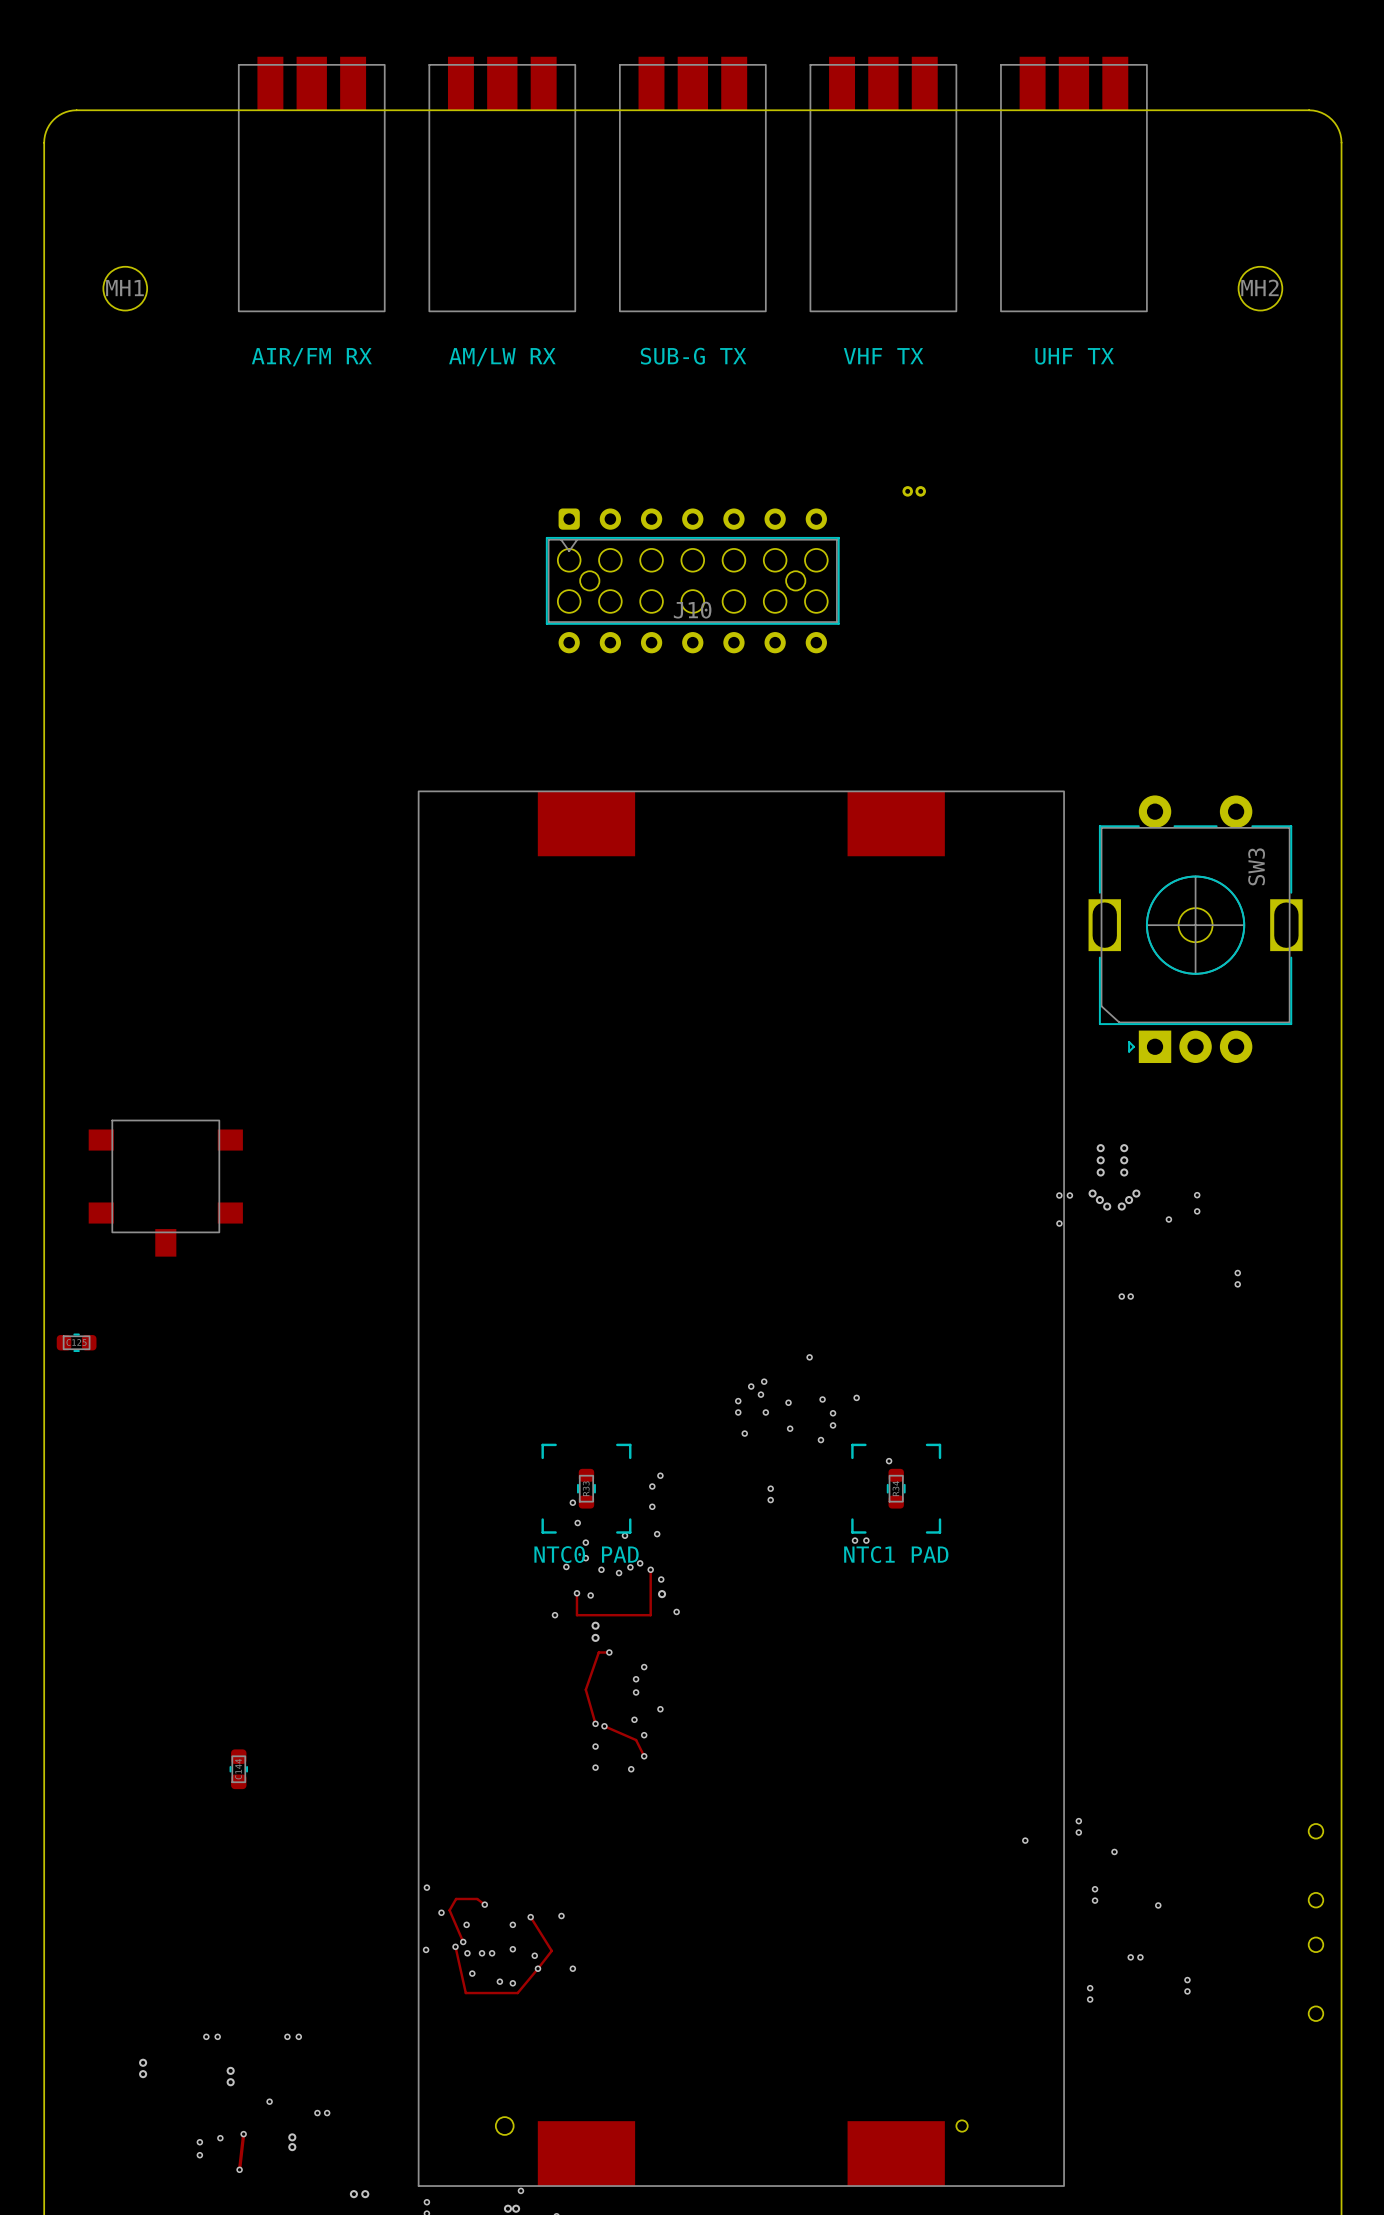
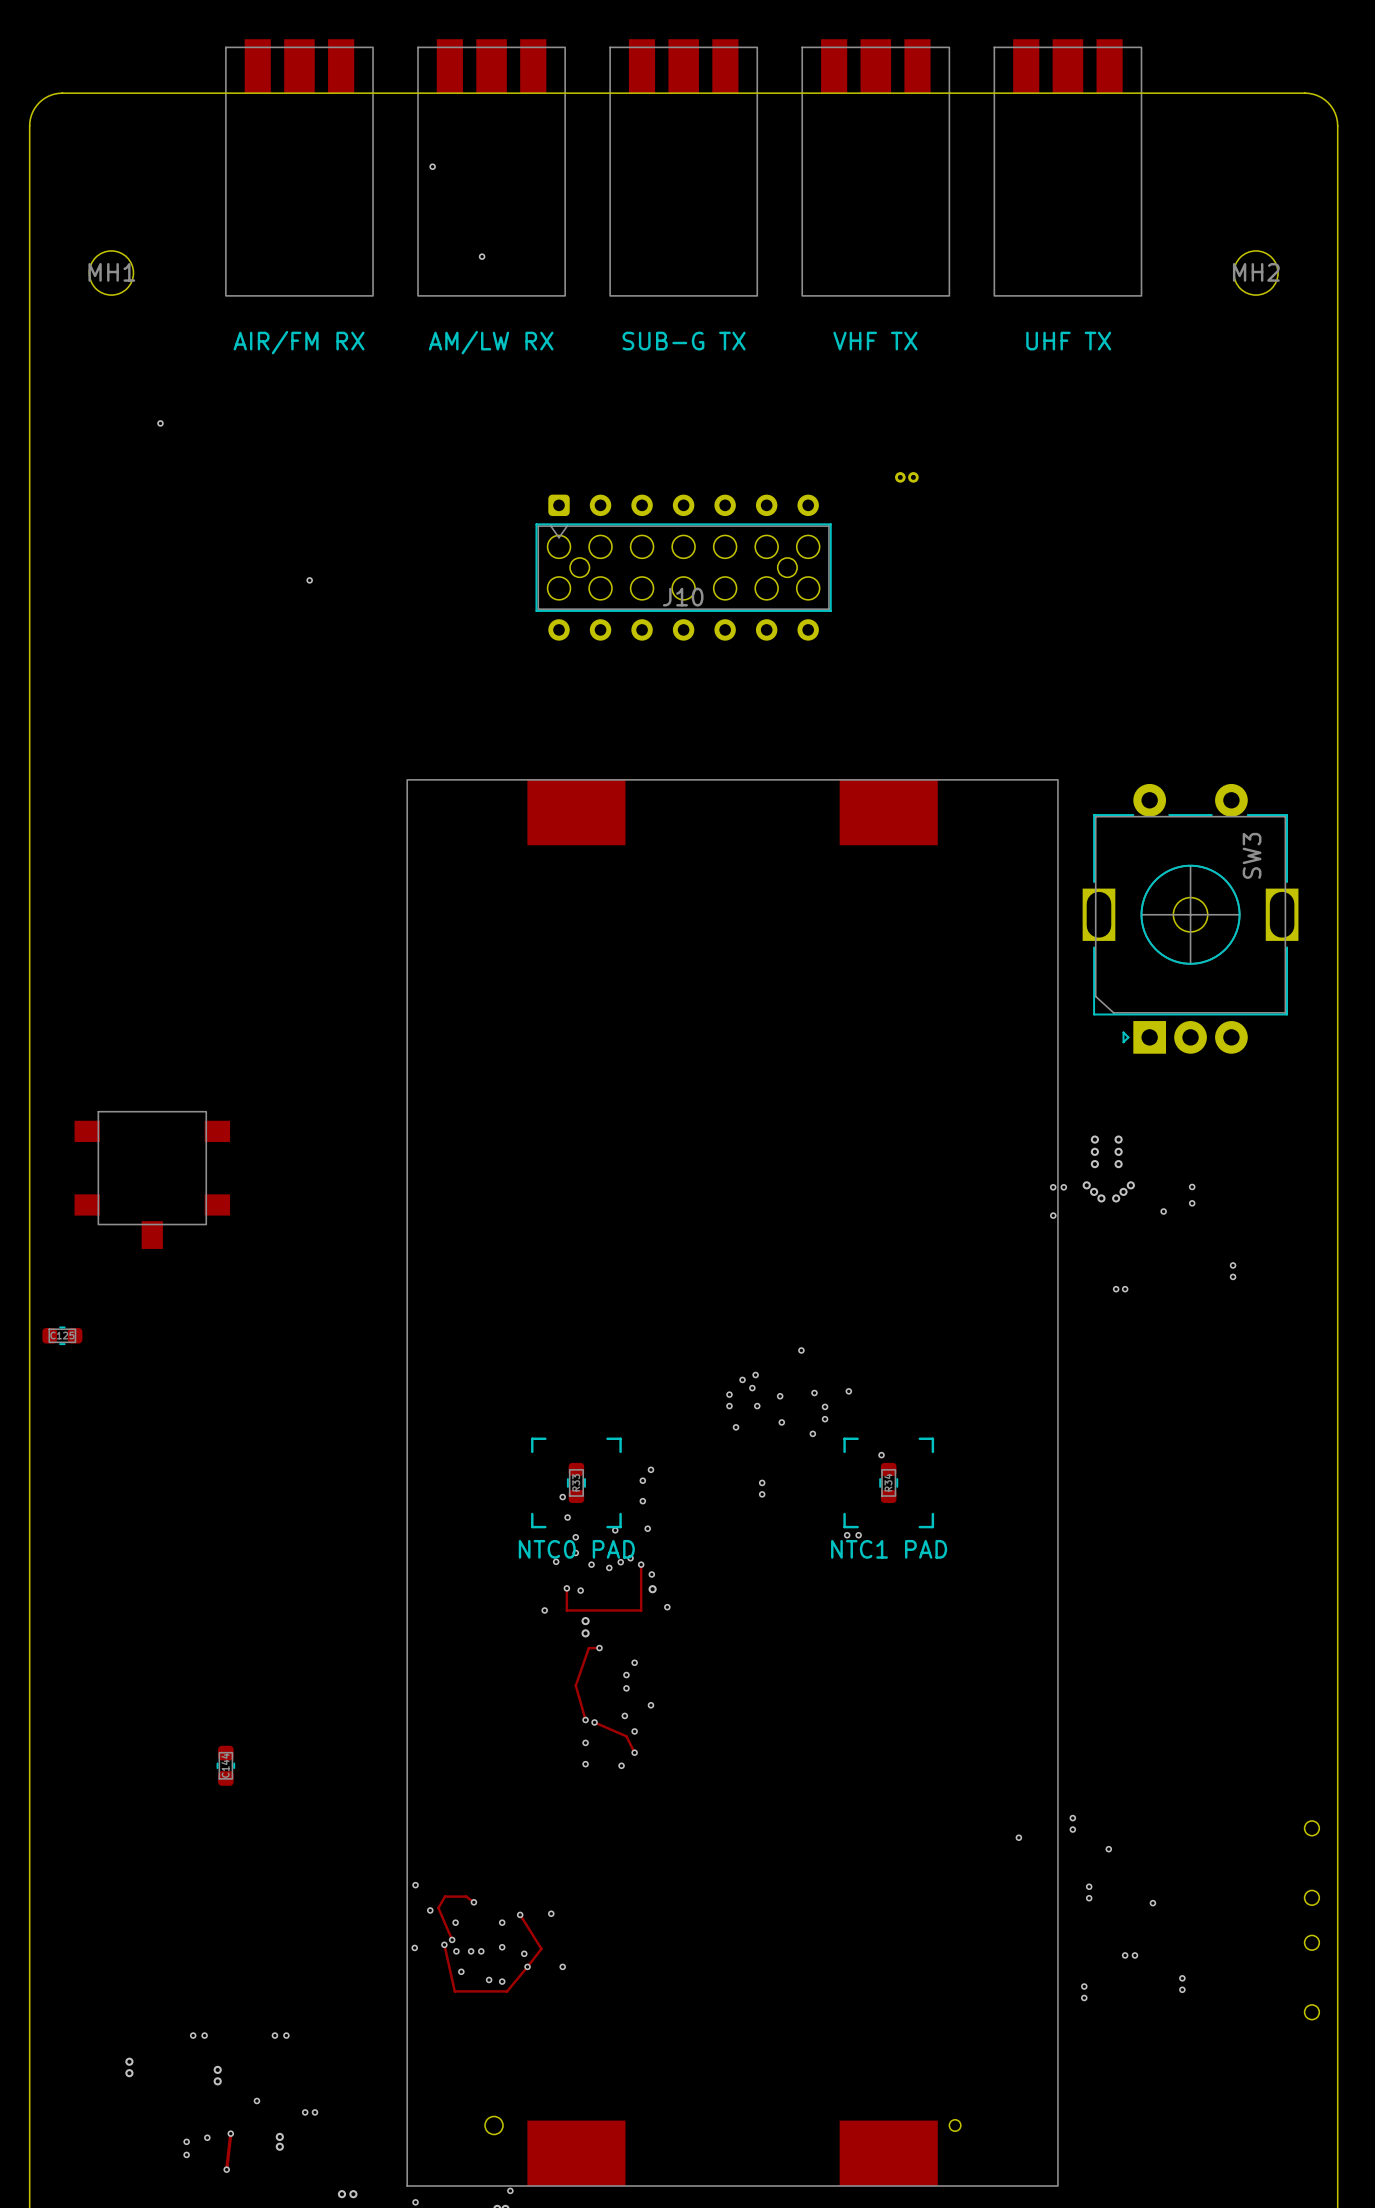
via: none -> (432, 166)
via: none -> (482, 256)
via: none -> (160, 423)
via: none -> (309, 580)

